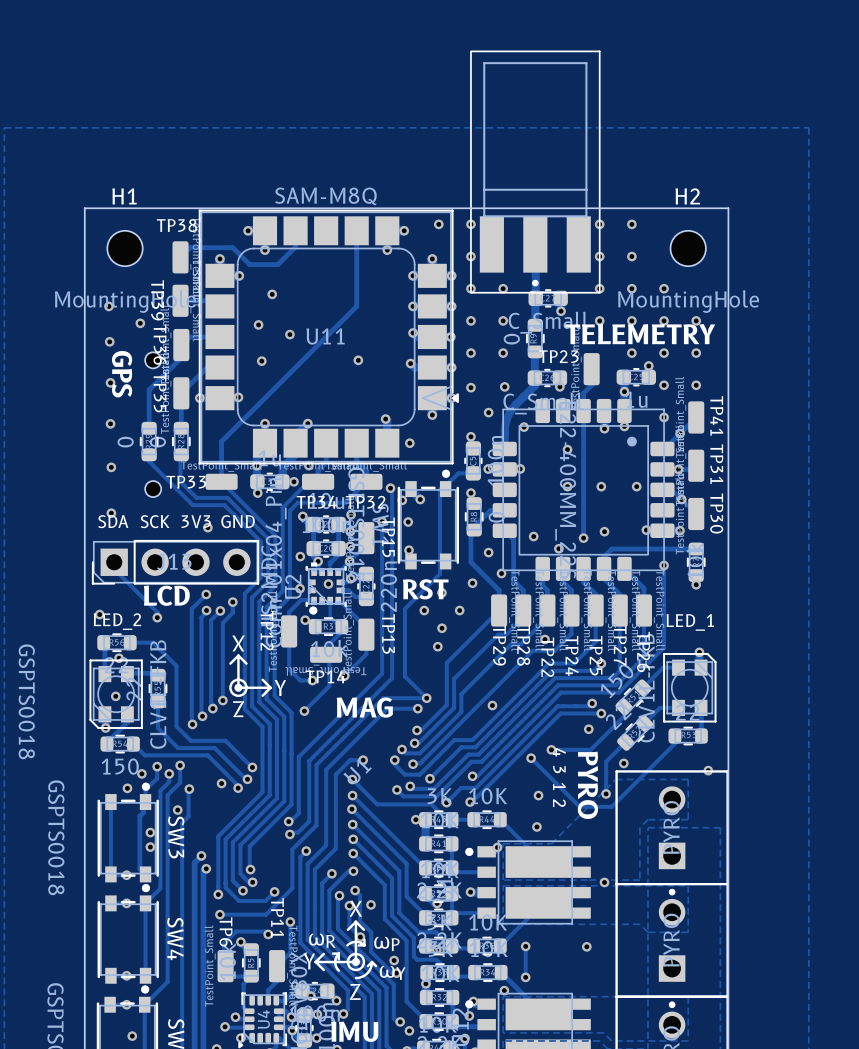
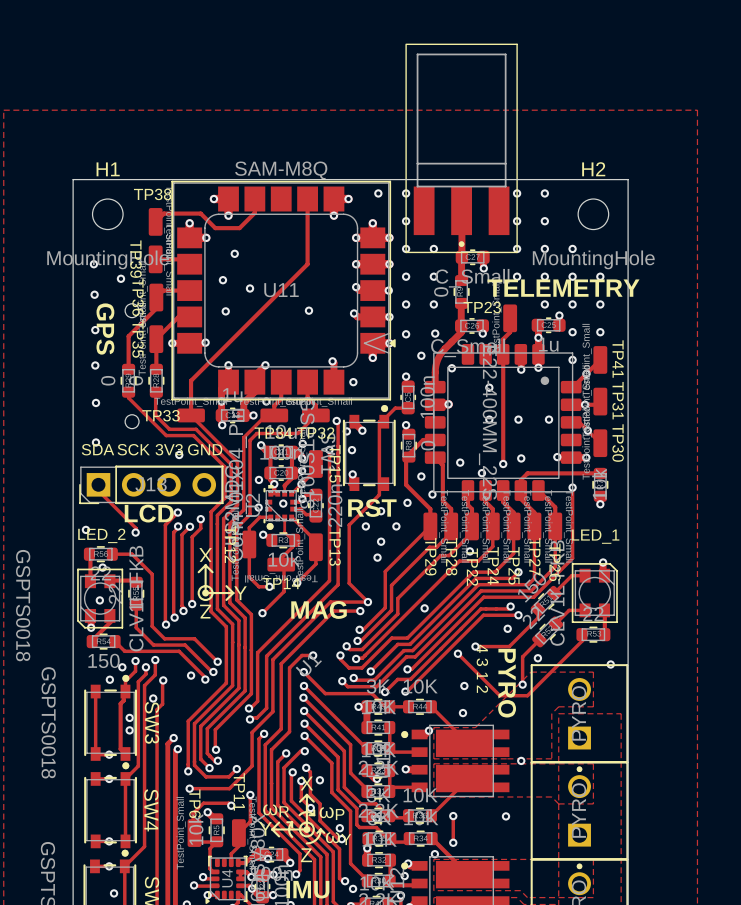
via: (488, 469) -> none

